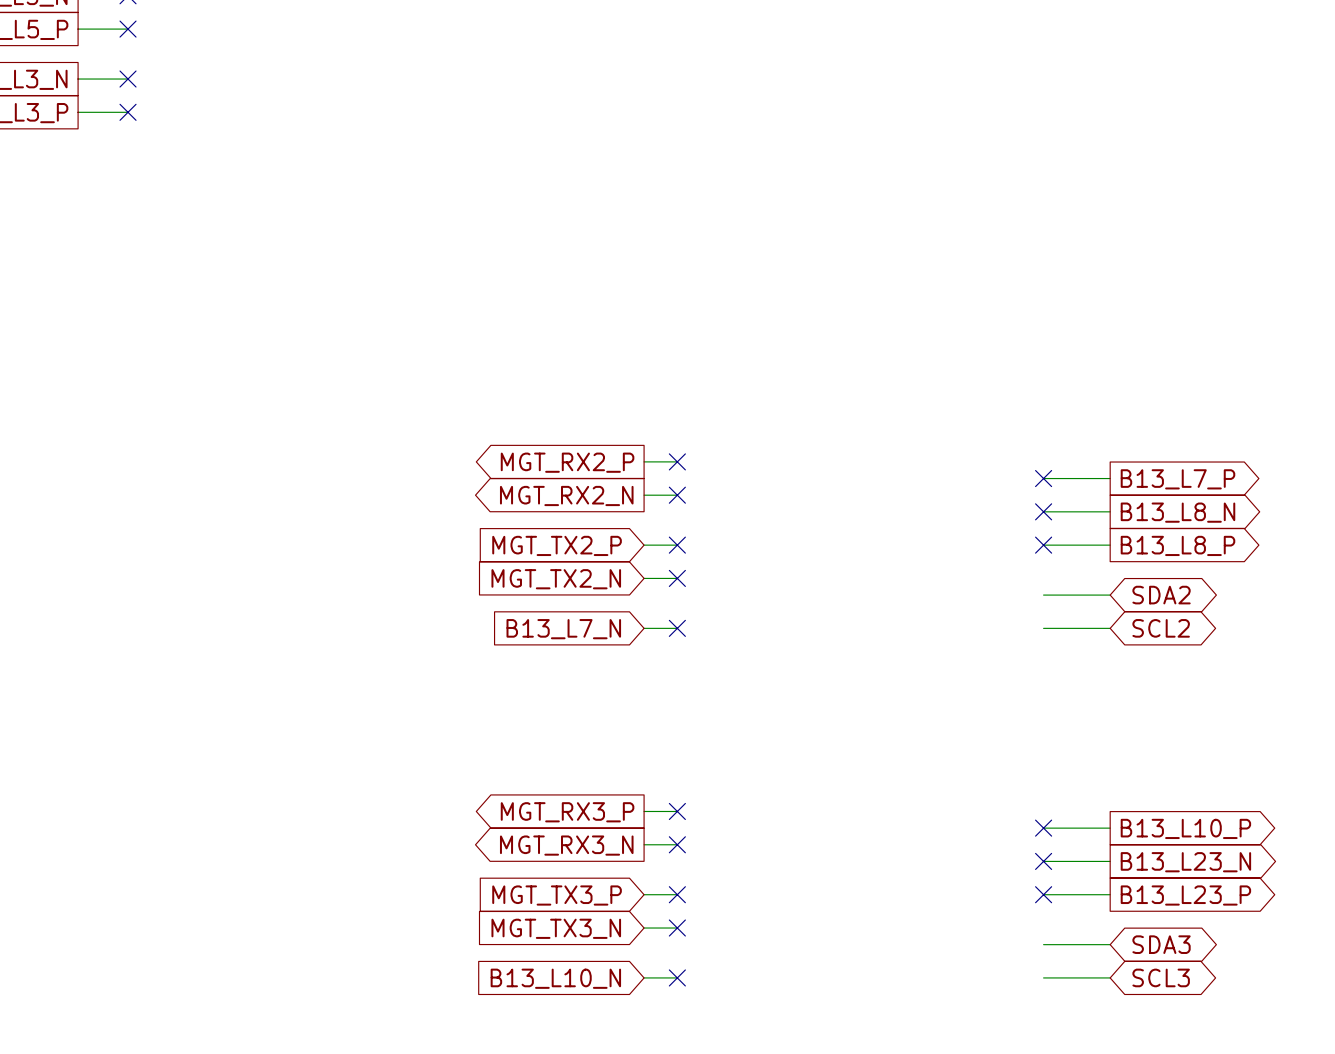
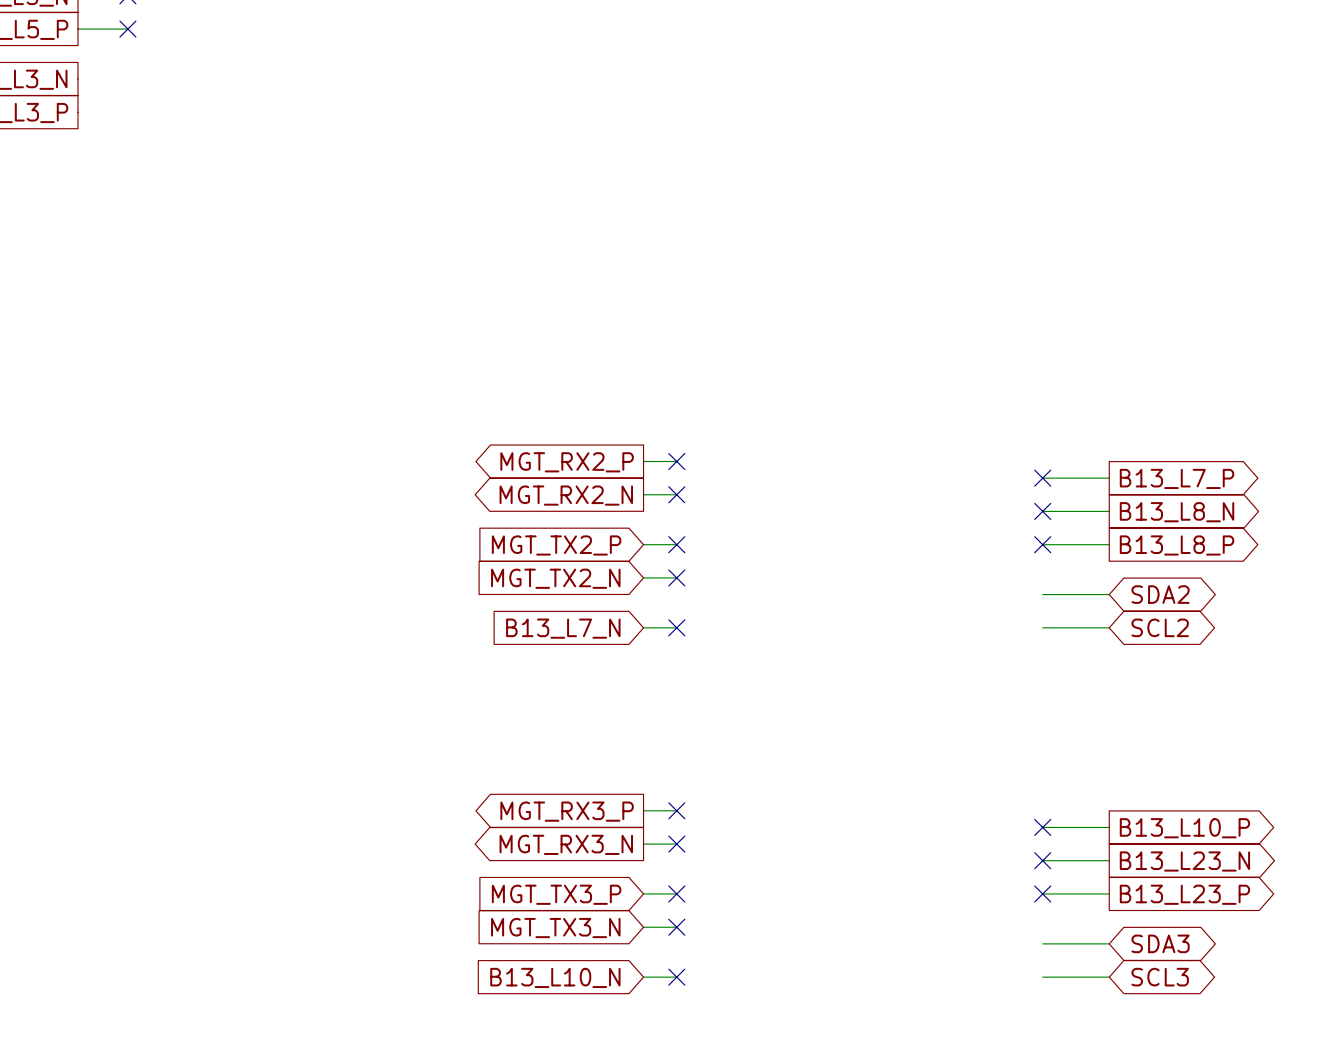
wire: (78, 79) (128, 79) -> none
no-connect mark: (128, 79) -> none
wire: (78, 112) (128, 112) -> none
no-connect mark: (128, 112) -> none

